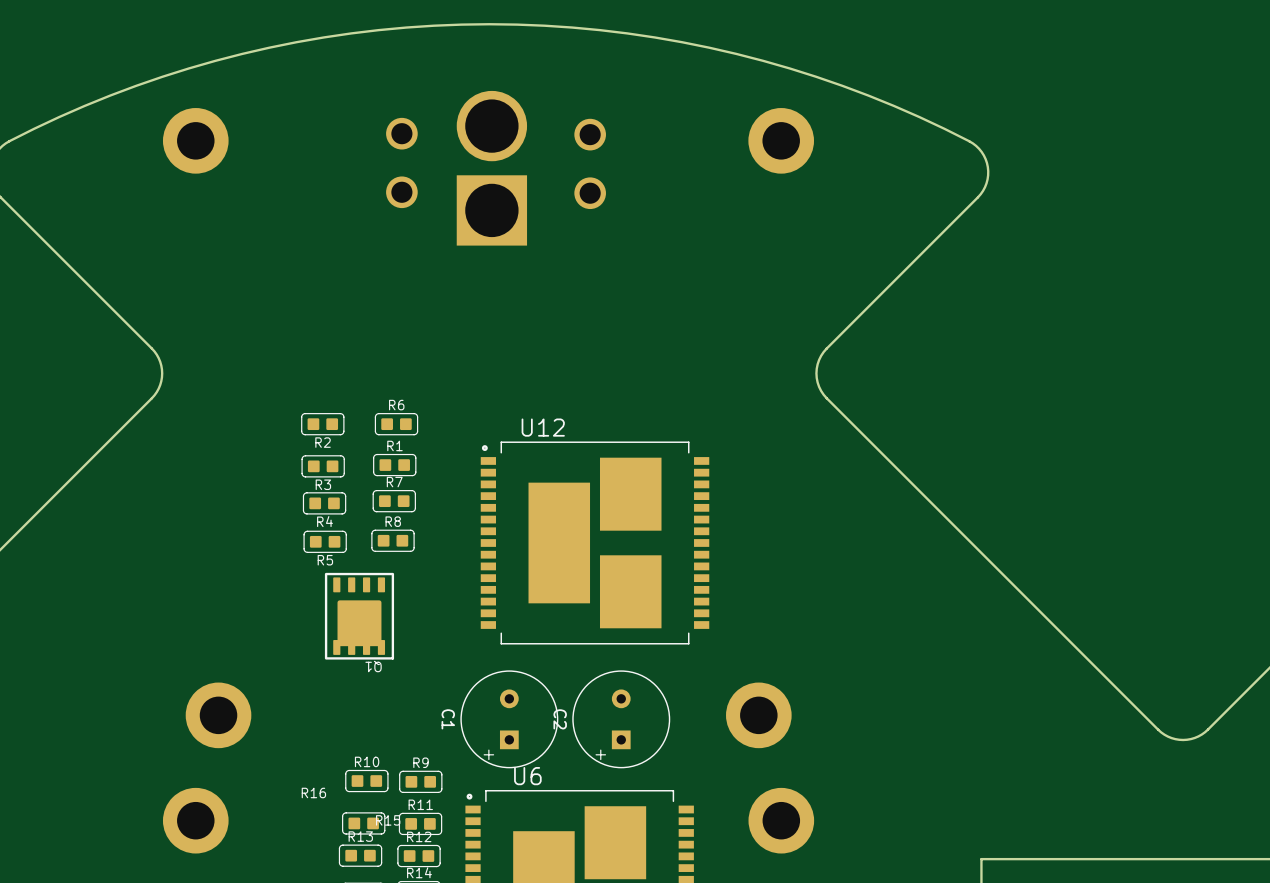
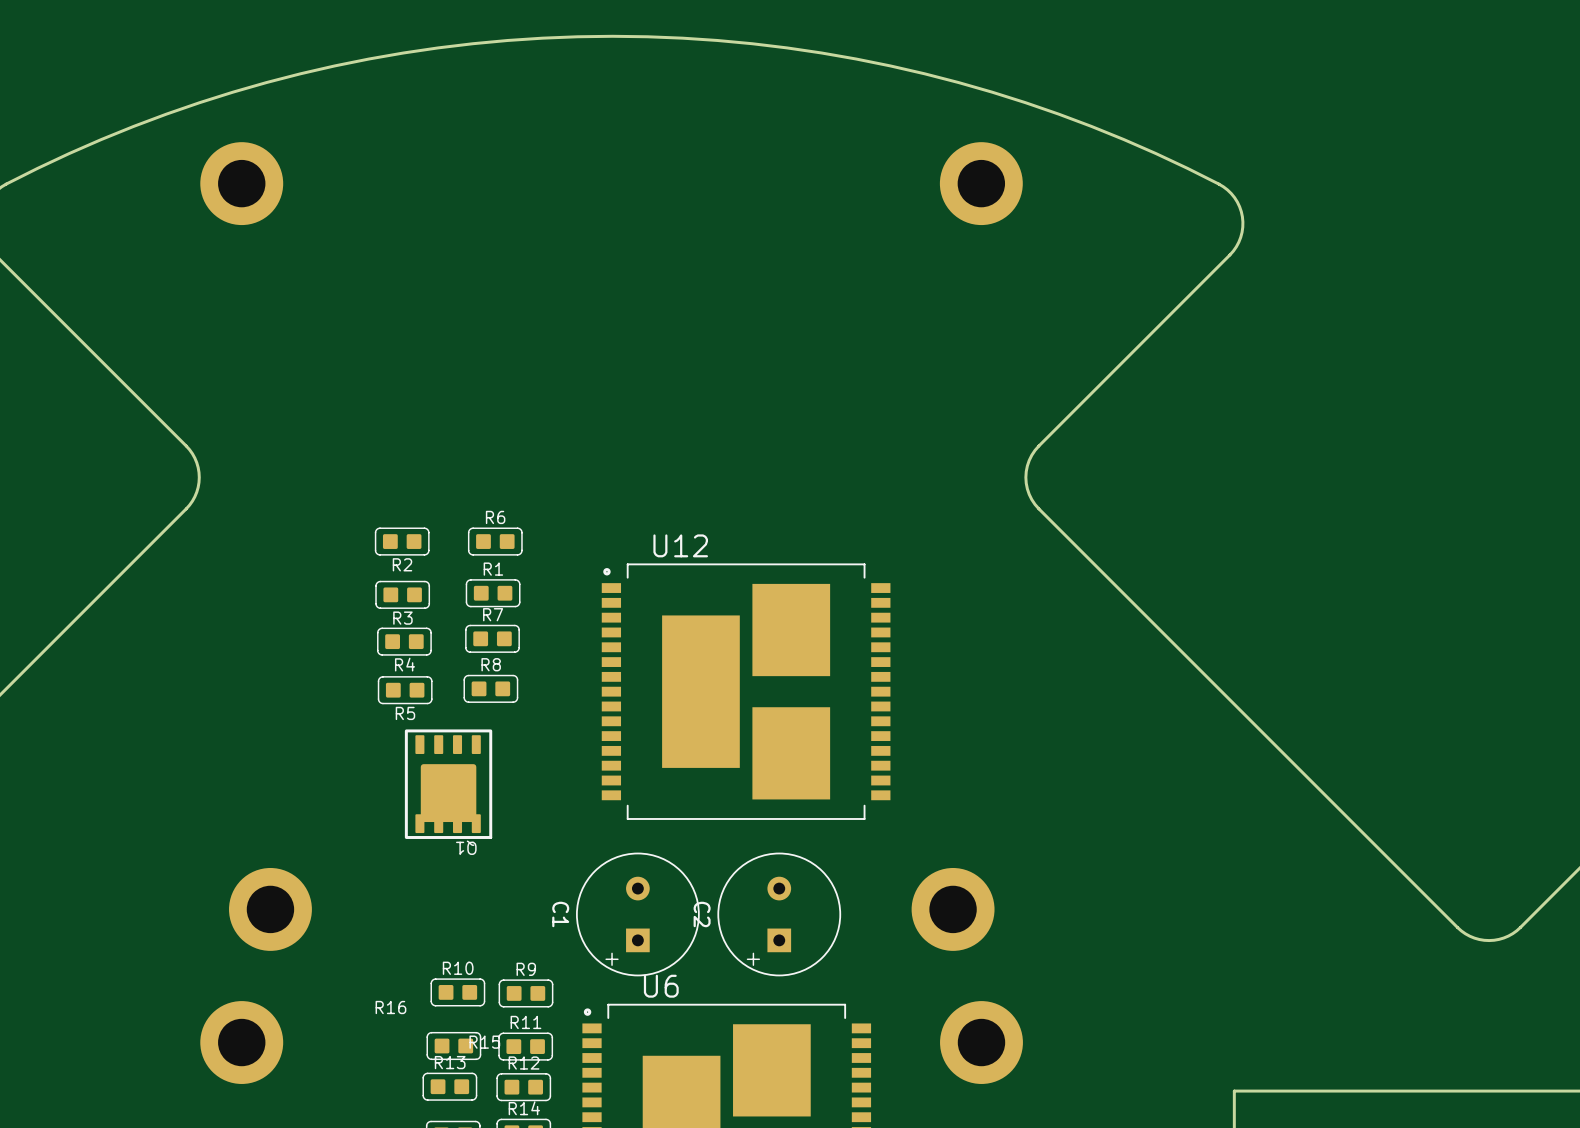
part: (401, 162) -> none
part: (590, 163) -> none
part: (491, 168) -> none

